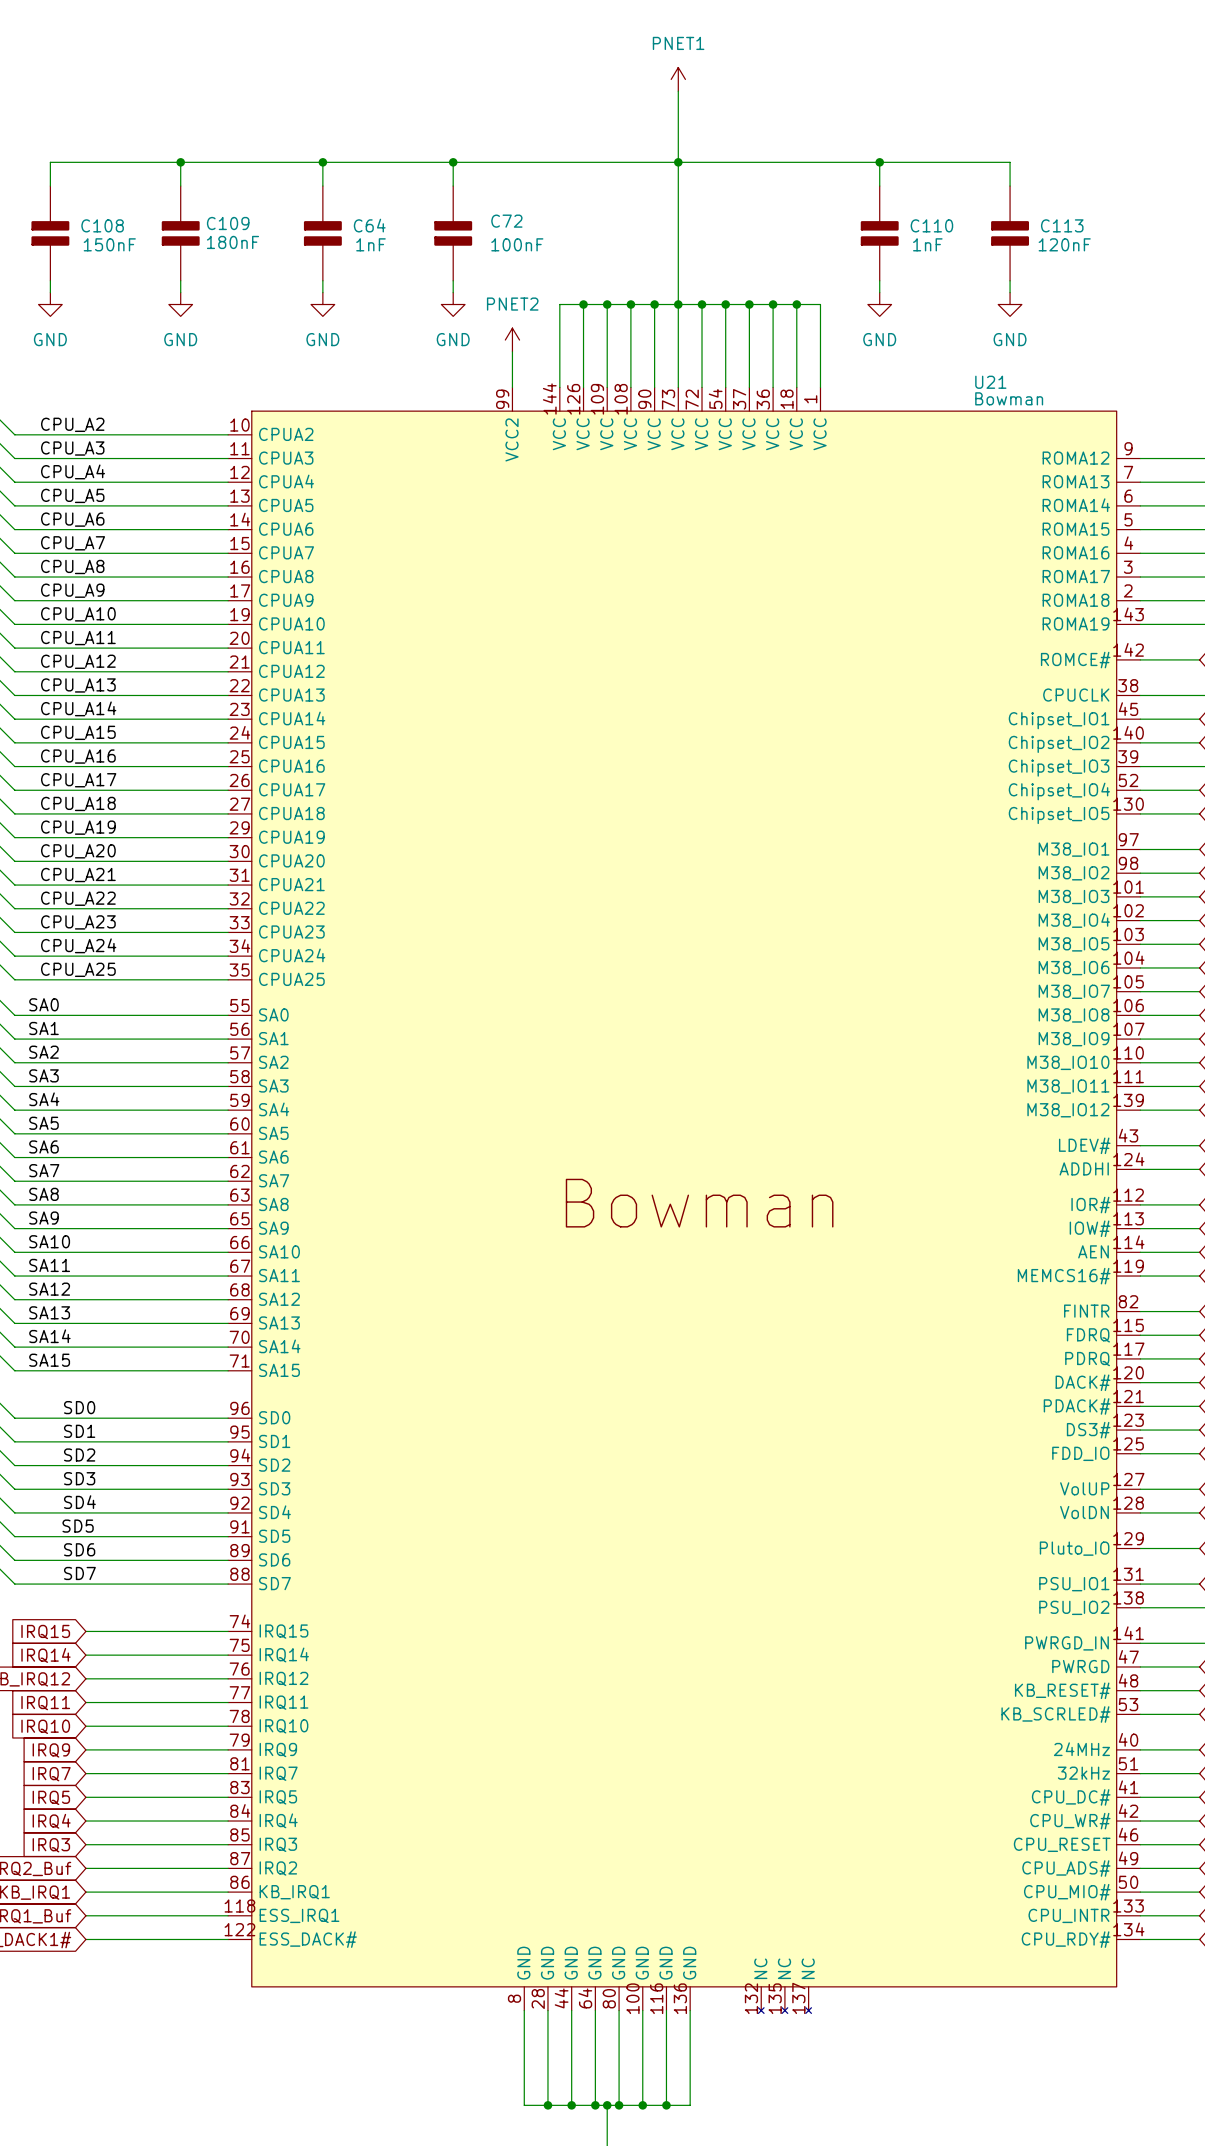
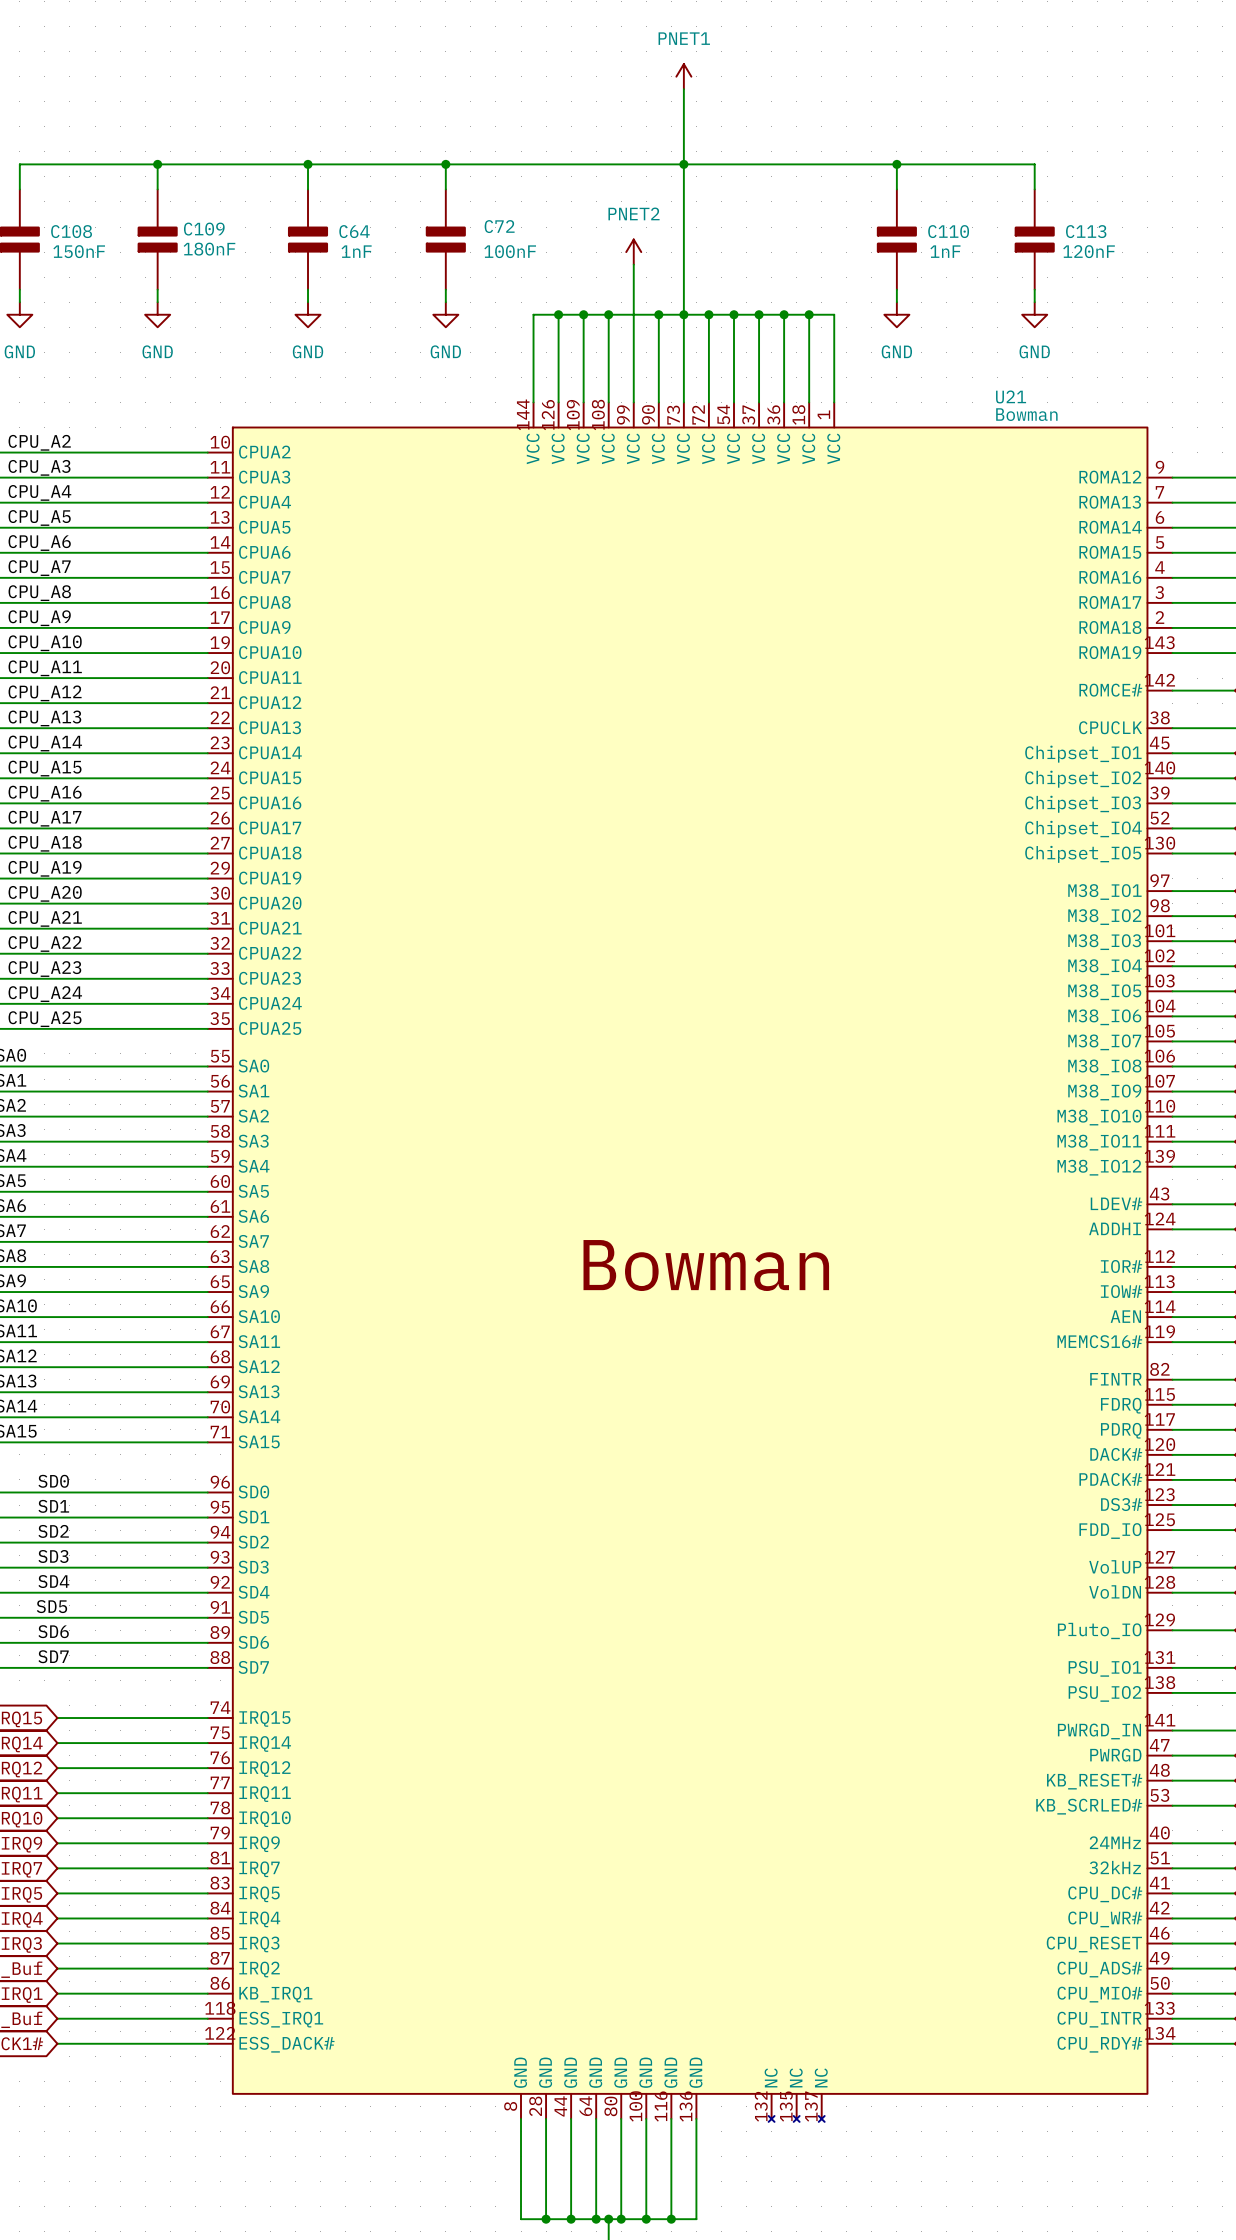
wire: none -> (633, 264) (633, 314)
wire: none -> (558, 314) (533, 314) (533, 402)
junction: none -> (558, 314)
junction: (630, 304) -> none
power symbol position: PNET2 (512, 340) -> PNET2 (633, 252)
wire: (512, 351) (512, 387) -> none
U21 symbol: [228, 387, 1141, 2014] -> [207, 402, 1173, 2122]

